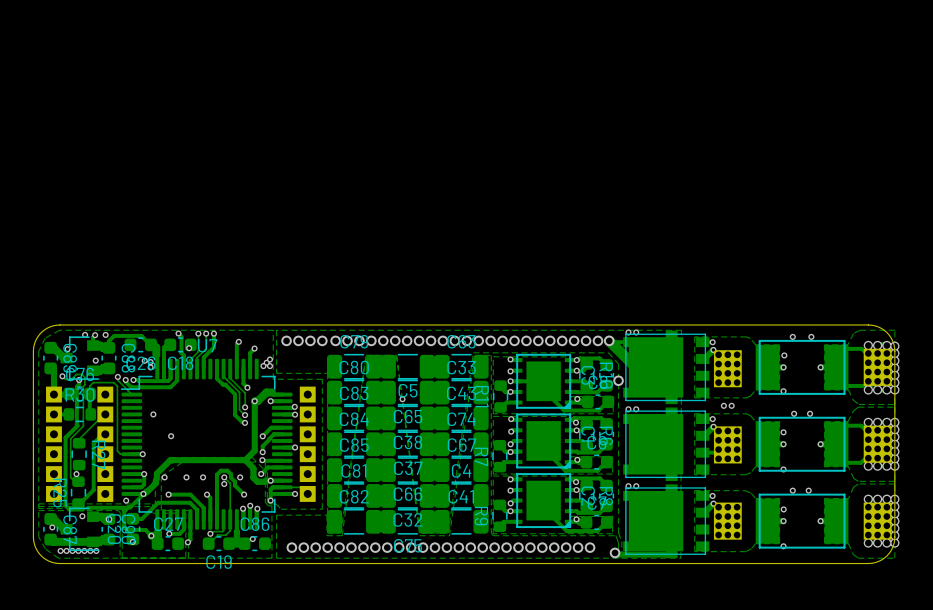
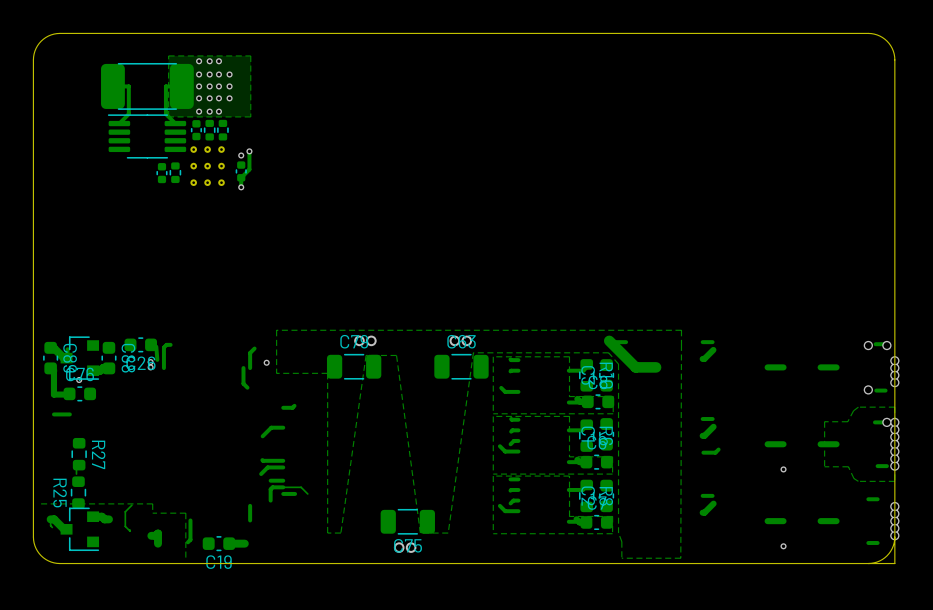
zone outline: none -> (250, 55) (250, 116) (168, 116) (168, 55) (250, 55)
via: none -> (199, 61)
via: none -> (209, 61)
via: none -> (218, 61)
via: none -> (199, 74)
via: none -> (209, 74)
via: none -> (218, 74)
via: none -> (229, 74)
track: none -> (112, 86) (128, 86) (128, 114) (119, 123)
part: none -> (147, 86)
track: none -> (181, 86) (165, 86) (165, 114) (175, 123)
via: none -> (199, 86)
via: none -> (209, 86)
via: none -> (218, 86)
via: none -> (229, 86)
via: none -> (199, 98)
via: none -> (209, 98)
via: none -> (218, 98)
via: none -> (229, 98)
via: none -> (199, 111)
via: none -> (209, 111)
via: none -> (218, 111)
part: none -> (196, 130)
part: none -> (209, 130)
part: none -> (222, 130)
part: none -> (147, 136)
track: none -> (249, 151) (249, 169) (241, 177) (241, 187)
via: none -> (249, 151)
via: none -> (241, 155)
part: none -> (207, 166)
part: none -> (241, 171)
part: none -> (175, 172)
part: none -> (161, 173)
via: none -> (241, 187)
zone outline: (894, 330) (894, 404) (859, 404) (853, 400) (848, 389) (824, 389) (824, 344) (847, 344) (853, 333) (859, 330) (894, 330) -> none
via: (628, 332) -> none
via: (636, 332) -> none
track: (178, 333) (181, 336) (183, 368) -> none
via: (178, 333) -> none
track: (198, 333) (198, 351) (190, 359) (190, 368) -> none
via: (198, 333) -> none
track: (206, 333) (206, 348) (197, 357) (197, 368) -> none
via: (206, 333) -> none
track: (213, 333) (213, 347) (203, 357) (203, 368) -> none
via: (213, 333) -> none
via: (85, 334) -> none
via: (105, 334) -> none
track: (95, 335) (93, 337) (93, 345) (100, 345) (103, 348) (108, 348) (109, 341) (114, 335) (141, 335) (156, 347) (156, 354) -> none
via: (95, 335) -> none
zone outline: (746, 336) (755, 344) (779, 344) (779, 389) (755, 389) (746, 397) (694, 397) (694, 336) (746, 336) -> none
via: (792, 336) -> none
via: (811, 336) -> none
via: (286, 340) -> none
via: (298, 340) -> none
via: (310, 340) -> none
via: (322, 340) -> none
via: (335, 340) -> none
via: (347, 340) -> none
via: (383, 340) -> none
via: (395, 340) -> none
via: (407, 340) -> none
via: (419, 340) -> none
via: (431, 340) -> none
via: (442, 340) -> none
via: (478, 340) -> none
via: (490, 340) -> none
via: (502, 340) -> none
via: (514, 340) -> none
via: (526, 340) -> none
via: (538, 340) -> none
via: (550, 340) -> none
via: (562, 340) -> none
via: (574, 340) -> none
via: (586, 340) -> none
via: (597, 340) -> none
via: (609, 340) -> none
track: (238, 341) (236, 343) (236, 368) -> none
via: (238, 341) -> none
via: (712, 342) -> none
C18: (180, 344) -> none
via: (877, 345) -> none
via: (894, 346) -> none
via: (189, 348) -> none
via: (254, 348) -> none
track: (841, 348) (861, 348) (866, 353) -> none
via: (67, 349) -> none
via: (713, 349) -> none
board edge: (894, 351) (892, 339) (887, 332) (877, 326) (868, 324) (59, 324) (48, 327) (41, 332) (36, 339) (33, 351) -> (894, 351) (894, 56) (890, 45) (884, 39) (868, 33) (51, 34) (39, 43) (33, 59) (33, 351)
via: (894, 353) -> none
zone outline: (396, 355) (419, 535) (449, 535) (474, 355) (491, 355) (491, 533) (493, 535) (615, 535) (618, 543) (618, 558) (276, 558) (276, 515) (326, 515) (326, 535) (342, 535) (366, 355) -> none
via: (784, 355) -> none
via: (269, 359) -> none
via: (510, 359) -> none
via: (95, 360) -> none
via: (144, 360) -> none
track: (568, 360) (599, 358) (606, 365) -> none
via: (576, 360) -> none
via: (263, 366) -> none
via: (269, 366) -> none
C5: (407, 366) -> none
part: (666, 367) -> none
via: (783, 367) -> none
part: (802, 367) -> none
via: (820, 367) -> none
part: (877, 367) -> none
track: (170, 368) (170, 378) (168, 381) (133, 379) -> none
track: (177, 368) (177, 380) (170, 387) (131, 387) (125, 379) -> none
track: (216, 368) (216, 378) (235, 394) (235, 415) (245, 422) -> none
track: (223, 368) (223, 376) (239, 392) (239, 410) (245, 415) -> none
track: (230, 368) (230, 378) (245, 393) (245, 407) -> none
part: (727, 368) -> none
via: (576, 370) -> none
via: (510, 371) -> none
track: (62, 376) (65, 379) (71, 379) (76, 374) (81, 374) (84, 377) (83, 426) (70, 438) (70, 477) (78, 482) (76, 484) -> none
via: (62, 376) -> none
track: (117, 376) (117, 380) (130, 393) (124, 394) -> none
via: (117, 376) -> none
via: (125, 379) -> none
via: (133, 379) -> none
track: (79, 380) (76, 386) (76, 426) (65, 437) (65, 505) (69, 509) (82, 509) -> none
via: (618, 380) -> none
track: (510, 381) (543, 381) (543, 389) (564, 410) (598, 410) (607, 401) -> none
via: (510, 381) -> none
part: (543, 381) -> none
track: (568, 381) (584, 381) (588, 385) -> none
track: (875, 381) (870, 385) (841, 385) -> none
track: (606, 385) (597, 392) (568, 391) -> none
via: (247, 387) -> none
via: (877, 389) -> none
via: (886, 389) -> none
via: (894, 389) -> none
via: (510, 391) -> none
via: (783, 391) -> none
C80: (354, 392) -> none
C65: (407, 392) -> none
C33: (461, 392) -> none
track: (273, 394) (266, 392) (257, 401) (254, 401) -> none
R11: (500, 396) -> none
via: (577, 398) -> none
via: (402, 399) -> none
track: (254, 401) (254, 450) (245, 460) -> none
via: (254, 401) -> none
via: (270, 401) -> none
track: (518, 402) (506, 402) (501, 407) -> none
via: (723, 405) -> none
via: (731, 405) -> none
via: (294, 406) -> none
via: (245, 407) -> none
via: (628, 409) -> none
via: (636, 409) -> none
zone outline: (746, 413) (694, 413) (694, 474) (745, 474) (750, 472) (755, 466) (779, 466) (779, 421) (755, 421) (746, 413) -> none
via: (794, 413) -> none
via: (810, 413) -> none
R30: (79, 414) -> none
track: (89, 414) (89, 386) (93, 382) (113, 382) (117, 386) (117, 451) (120, 454) (142, 454) -> none
track: (105, 414) (79, 439) (79, 444) -> none
via: (153, 414) -> none
via: (295, 414) -> none
via: (245, 415) -> none
C83: (354, 418) -> none
C38: (407, 418) -> none
C43: (461, 418) -> none
via: (511, 419) -> none
track: (572, 419) (574, 418) (601, 418) (606, 424) -> none
via: (712, 419) -> none
via: (245, 422) -> none
via: (576, 422) -> none
track: (865, 422) (865, 430) (861, 425) (841, 425) -> none
via: (868, 422) -> none
via: (877, 422) -> none
via: (713, 426) -> none
via: (576, 430) -> none
via: (511, 431) -> none
via: (783, 432) -> none
track: (105, 434) (102, 434) (93, 443) (93, 490) (81, 502) (78, 502) -> none
track: (283, 434) (273, 434) (262, 446) (262, 452) -> none
via: (171, 436) -> none
via: (262, 436) -> none
track: (543, 440) (543, 448) (565, 470) (597, 470) (606, 462) -> none
part: (543, 440) -> none
track: (568, 440) (582, 440) (586, 445) -> none
part: (53, 444) -> none
part: (105, 444) -> none
U7: (206, 444) -> none
part: (307, 444) -> none
C84: (354, 444) -> none
C37: (407, 444) -> none
C74: (461, 444) -> none
via: (510, 444) -> none
track: (606, 444) (598, 452) (568, 451) -> none
part: (666, 444) -> none
part: (727, 444) -> none
via: (783, 444) -> none
part: (802, 444) -> none
via: (820, 444) -> none
part: (877, 444) -> none
via: (295, 447) -> none
via: (262, 452) -> none
via: (510, 452) -> none
via: (142, 454) -> none
R7: (499, 456) -> none
track: (865, 458) (861, 462) (841, 462) -> none
via: (577, 459) -> none
track: (245, 460) (170, 460) (156, 473) (155, 483) (143, 493) -> none
track: (246, 460) (255, 468) (255, 476) (259, 480) (270, 480) (257, 481) (253, 477) (253, 468) (245, 460) -> none
via: (262, 460) -> none
zone outline: (265, 462) (182, 462) (161, 476) (161, 510) (189, 510) (188, 558) (120, 558) (120, 512) (118, 510) (38, 510) (38, 537) (45, 548) (58, 558) (271, 558) (271, 505) (265, 502) (265, 462) -> none
track: (518, 462) (503, 462) (499, 466) -> none
via: (868, 466) -> none
via: (877, 466) -> none
via: (886, 466) -> none
C85: (354, 470) -> none
C66: (407, 470) -> none
C67: (461, 470) -> none
via: (76, 474) -> none
track: (144, 474) (144, 484) (141, 487) (130, 487) -> none
via: (144, 474) -> none
via: (261, 474) -> none
via: (164, 477) -> none
via: (186, 477) -> none
via: (203, 477) -> none
track: (224, 477) (230, 483) (230, 530) (225, 535) (217, 535) (209, 543) -> none
via: (224, 477) -> none
via: (240, 477) -> none
via: (510, 479) -> none
via: (270, 480) -> none
track: (576, 482) (573, 479) (568, 479) (599, 478) (606, 486) -> none
via: (576, 482) -> none
via: (224, 484) -> none
zone outline: (894, 484) (894, 558) (858, 558) (853, 554) (848, 543) (824, 543) (824, 498) (848, 498) (853, 487) (858, 484) (894, 484) -> none
via: (628, 486) -> none
via: (636, 486) -> none
via: (576, 489) -> none
via: (510, 490) -> none
zone outline: (745, 490) (694, 490) (694, 551) (745, 551) (755, 543) (779, 543) (779, 498) (755, 498) (751, 493) (745, 490) -> none
via: (792, 490) -> none
via: (808, 490) -> none
track: (143, 493) (124, 510) (124, 527) (126, 530) (145, 530) (151, 535) -> none
via: (143, 493) -> none
via: (295, 493) -> none
track: (168, 494) (190, 494) (203, 507) (203, 520) -> none
via: (168, 494) -> none
track: (207, 494) (210, 497) (210, 520) -> none
via: (207, 494) -> none
track: (244, 494) (235, 485) (230, 474) (227, 470) (221, 470) (216, 474) (216, 520) (216, 506) -> none
via: (244, 494) -> none
C81: (354, 495) -> none
C32: (407, 495) -> none
C4: (461, 495) -> none
via: (712, 495) -> none
via: (868, 499) -> none
via: (877, 499) -> none
via: (886, 499) -> none
via: (894, 499) -> none
via: (126, 500) -> none
via: (270, 500) -> none
track: (543, 500) (543, 507) (566, 531) (597, 531) (606, 522) -> none
part: (543, 500) -> none
track: (568, 500) (581, 500) (586, 505) -> none
via: (510, 503) -> none
via: (713, 503) -> none
via: (250, 505) -> none
track: (606, 505) (599, 512) (568, 511) -> none
zone outline: (38, 506) (155, 506) (155, 473) (181, 457) (252, 457) (267, 472) (267, 501) (269, 503) (275, 503) (281, 509) (322, 509) (322, 379) (273, 379) (273, 330) (59, 330) (45, 338) (38, 351) (38, 508) (120, 508) (122, 510) (122, 558) -> none
track: (88, 507) (123, 507) (126, 510) -> none
via: (243, 508) -> none
via: (257, 508) -> none
via: (783, 509) -> none
via: (510, 511) -> none
R9: (499, 515) -> none
via: (82, 516) -> none
via: (108, 519) -> none
track: (132, 519) (141, 519) (158, 502) (189, 502) (197, 509) (197, 520) -> none
via: (576, 519) -> none
track: (183, 520) (183, 529) (179, 533) (169, 533) -> none
track: (223, 520) (223, 530) (210, 533) -> none
C82: (354, 521) -> none
C41: (461, 521) -> none
track: (518, 521) (503, 521) (499, 525) -> none
part: (666, 521) -> none
part: (727, 521) -> none
via: (783, 521) -> none
part: (802, 521) -> none
via: (820, 521) -> none
part: (877, 521) -> none
via: (52, 527) -> none
C87: (50, 529) -> none
C90: (108, 529) -> none
C20: (132, 529) -> none
via: (169, 533) -> none
via: (210, 533) -> none
via: (151, 535) -> none
board edge: none -> (894, 537) (894, 563) (868, 563)
track: (108, 539) (102, 539) (100, 541) (53, 541) (50, 539) (50, 541) -> none
via: (252, 539) -> none
via: (132, 541) -> none
via: (187, 542) -> none
via: (868, 542) -> none
via: (877, 542) -> none
via: (886, 542) -> none
via: (894, 542) -> none
C27: (167, 543) -> none
track: (236, 543) (236, 520) (236, 543) -> none
C86: (254, 543) -> none
via: (291, 547) -> none
via: (303, 547) -> none
via: (315, 547) -> none
via: (327, 547) -> none
via: (339, 547) -> none
via: (351, 547) -> none
via: (363, 547) -> none
via: (375, 547) -> none
via: (387, 547) -> none
via: (423, 547) -> none
via: (434, 547) -> none
via: (446, 547) -> none
via: (458, 547) -> none
via: (470, 547) -> none
via: (482, 547) -> none
via: (494, 547) -> none
via: (506, 547) -> none
via: (518, 547) -> none
via: (530, 547) -> none
via: (542, 547) -> none
via: (554, 547) -> none
via: (566, 547) -> none
via: (578, 547) -> none
via: (590, 547) -> none
via: (60, 550) -> none
via: (66, 550) -> none
via: (72, 550) -> none
via: (78, 550) -> none
via: (84, 550) -> none
via: (90, 550) -> none
via: (96, 550) -> none
track: (615, 552) (616, 554) (671, 554) -> none
via: (615, 552) -> none

